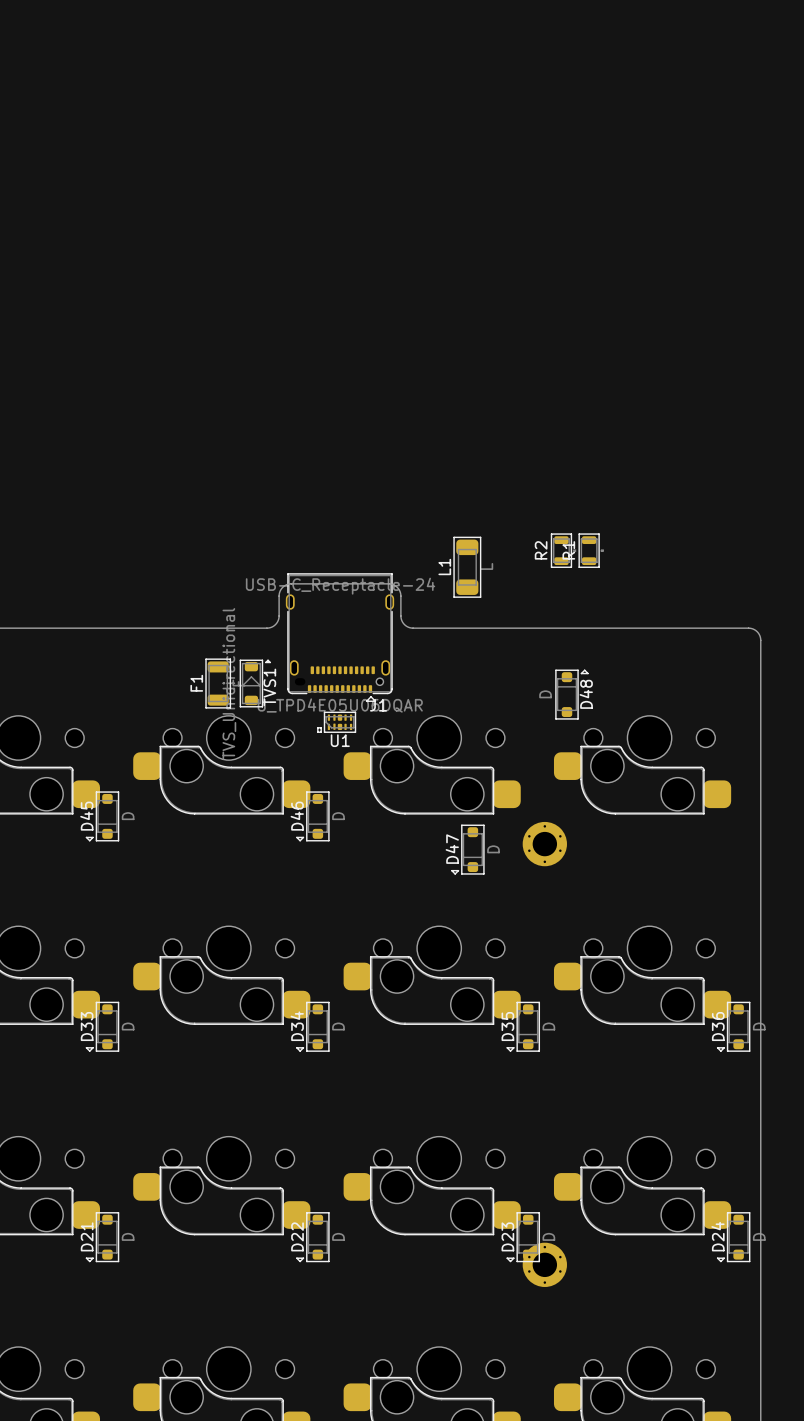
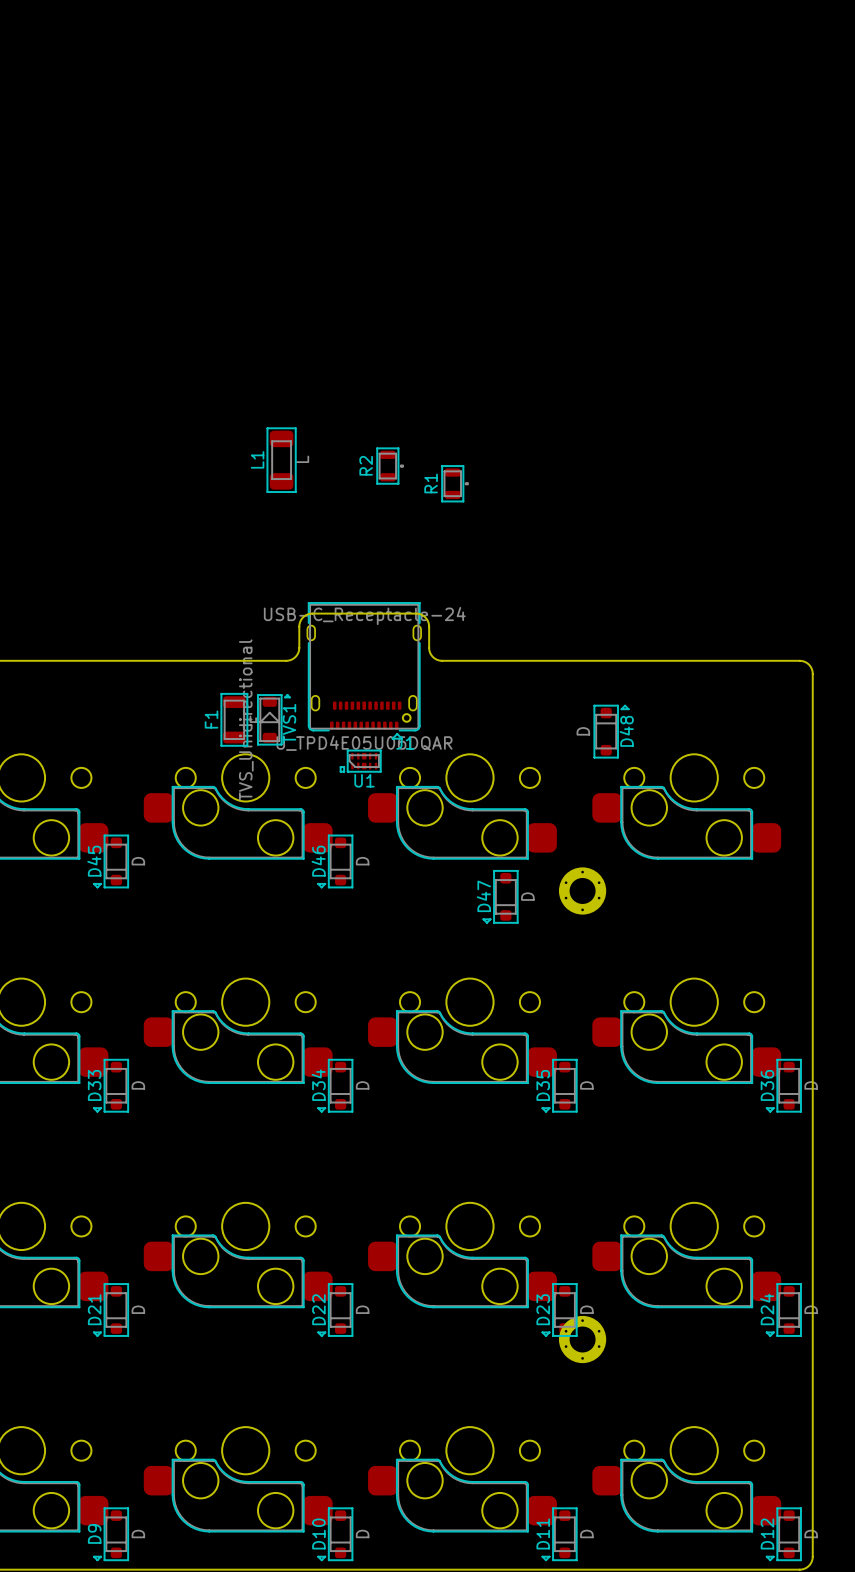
R2 position: (561, 550) -> (387, 466)
R1 position: (589, 550) -> (452, 483)
L1 position: (467, 567) -> (281, 460)

